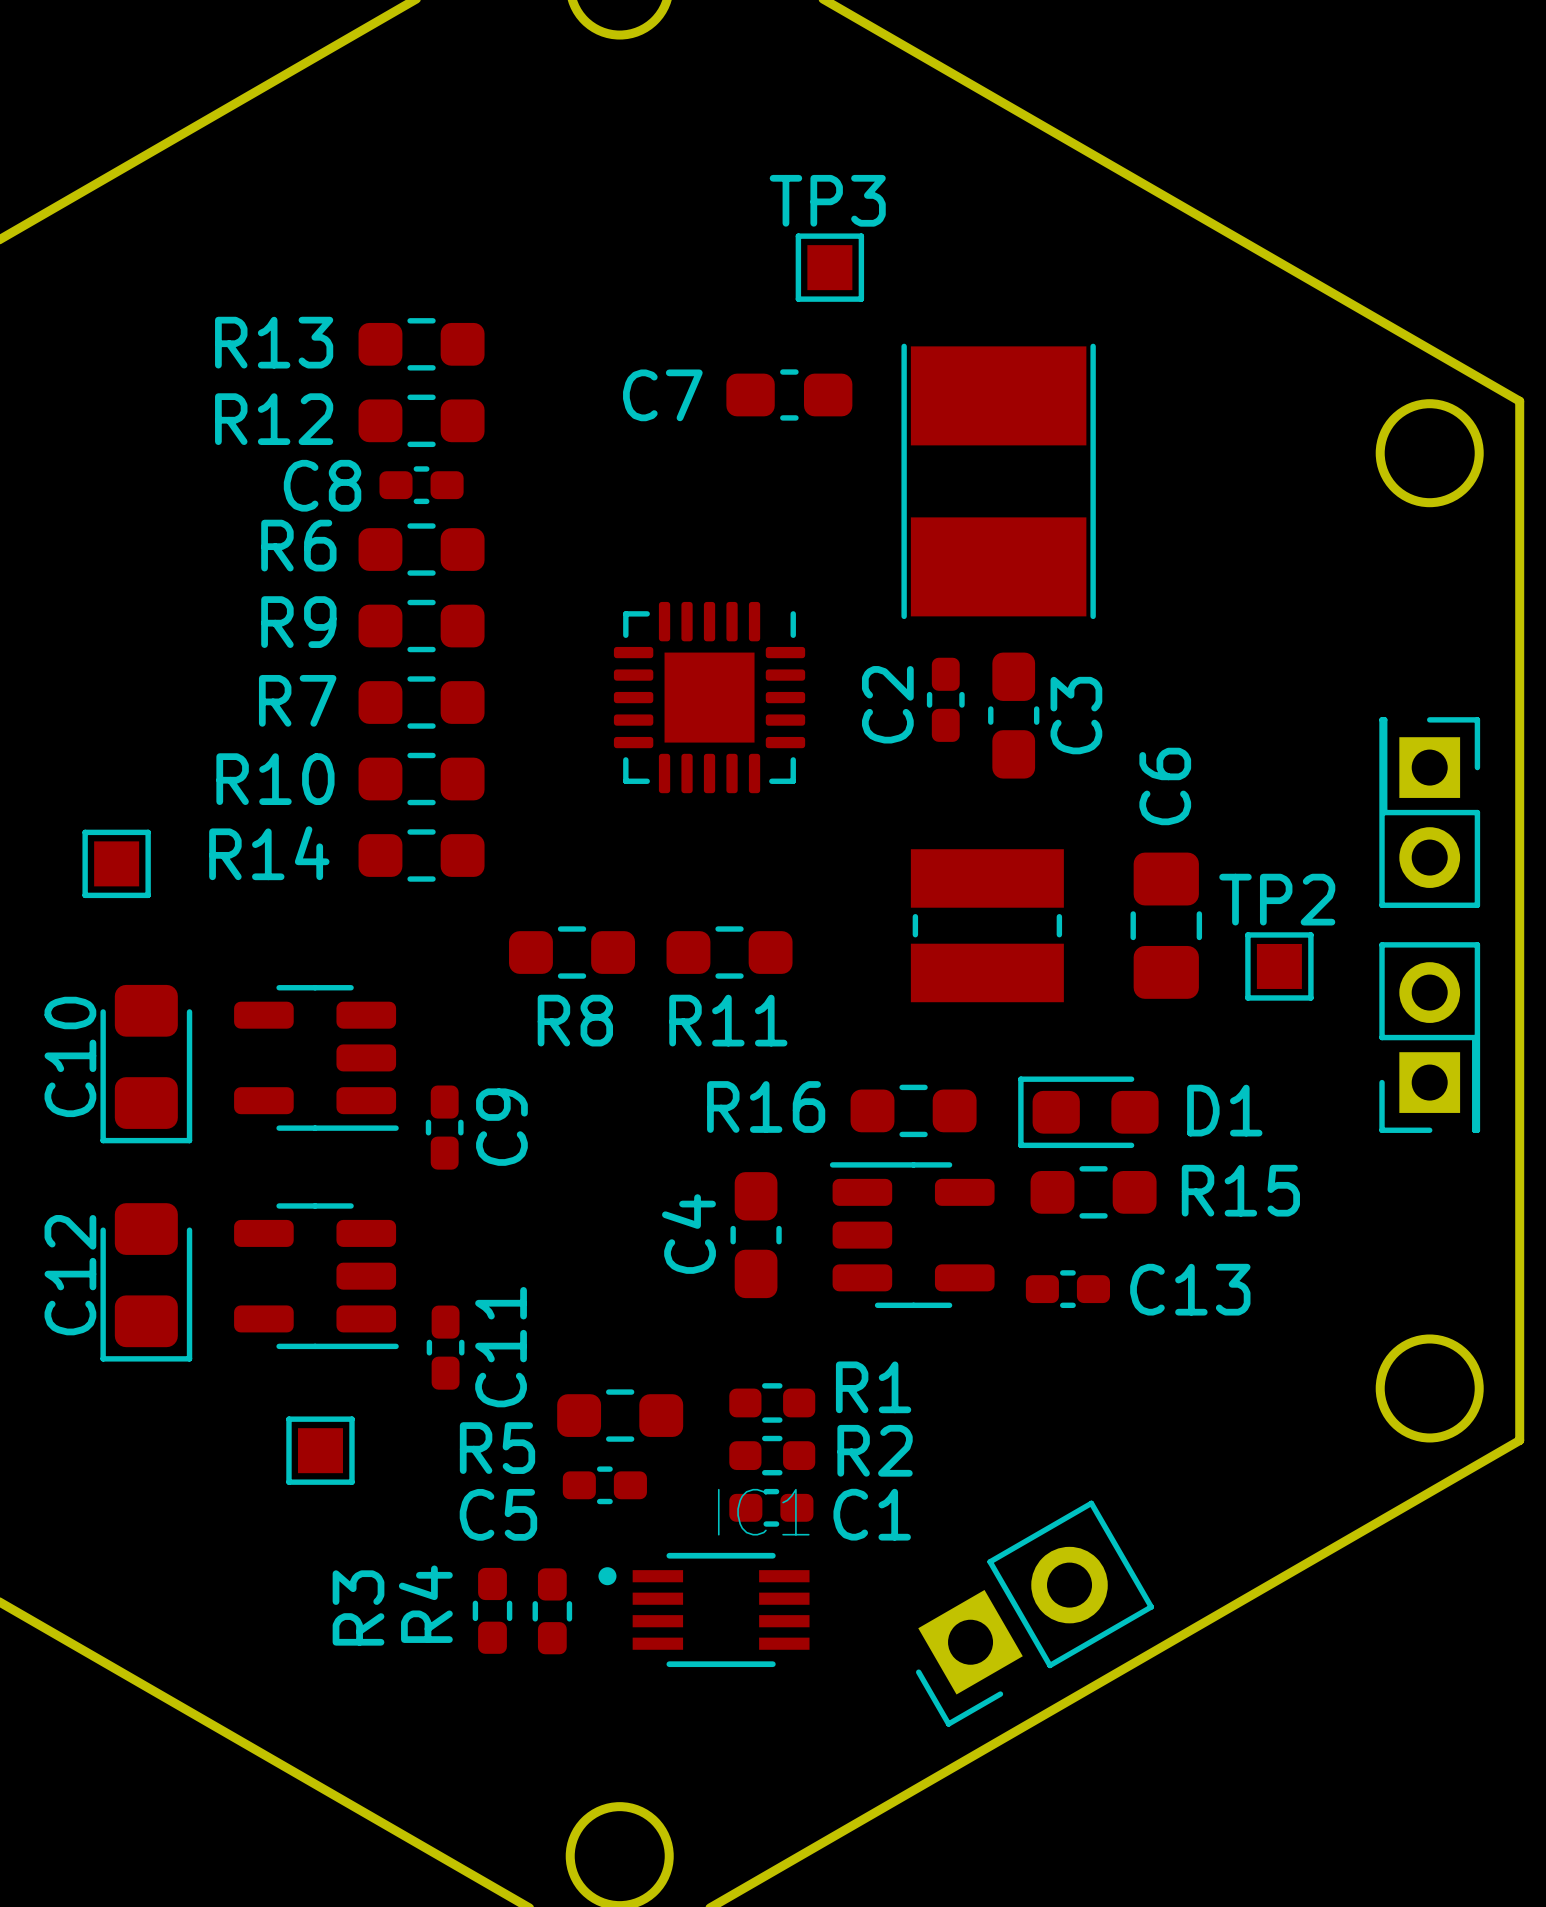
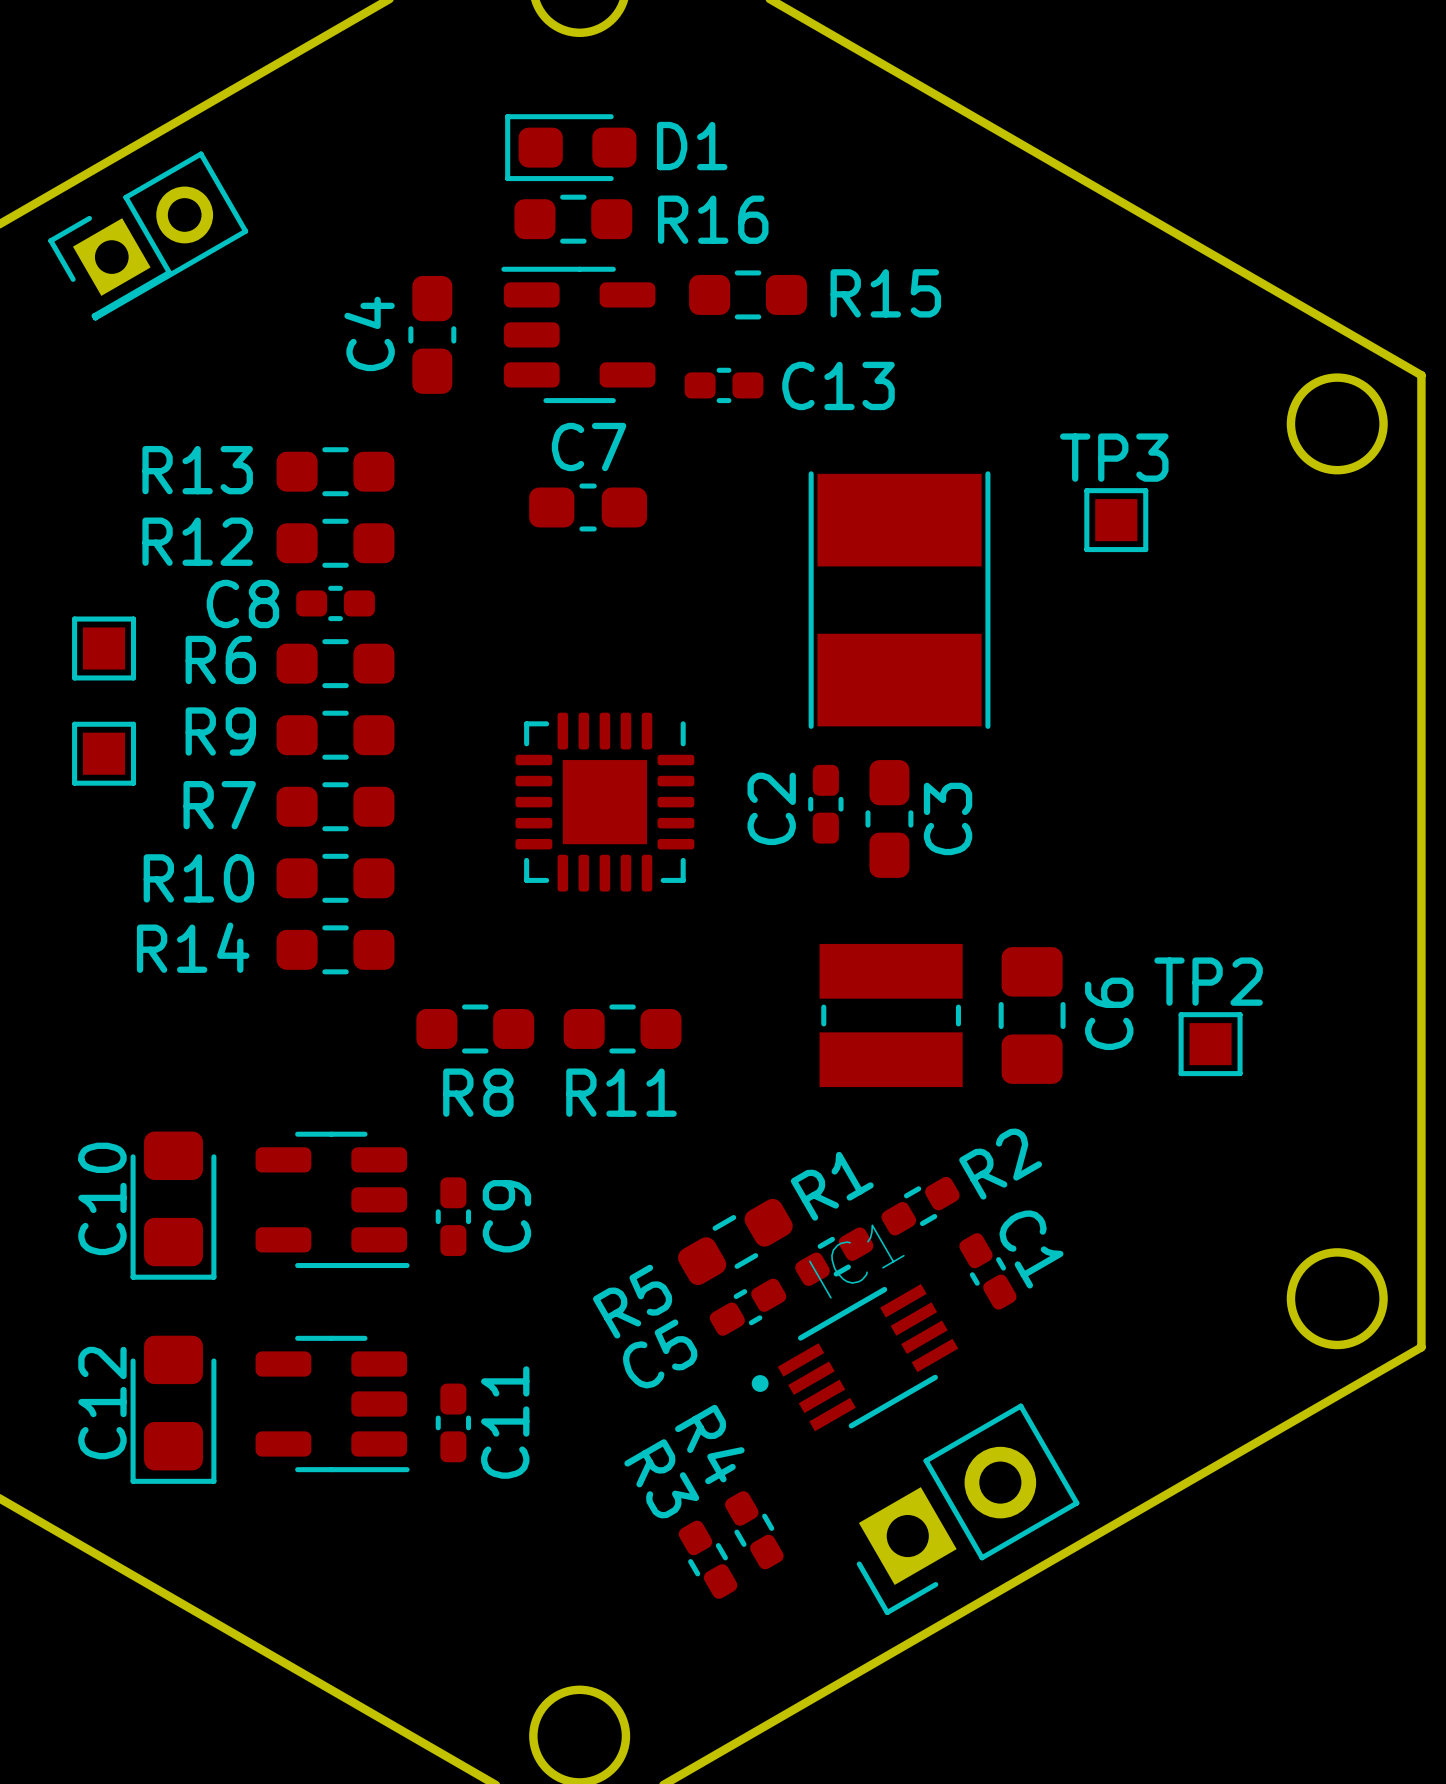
part: none -> (148, 236)
TP3 position: (829, 267) -> (1116, 520)
R13 position: (421, 344) -> (335, 471)
part: none -> (578, 334)
C7 position: (789, 394) -> (588, 507)
C7 name position: C7 (662, 395) -> C7 (589, 446)
R12 position: (421, 420) -> (335, 543)
part position: (998, 481) -> (899, 600)
C8 position: (421, 485) -> (335, 603)
R6 position: (421, 549) -> (335, 663)
R9 position: (421, 626) -> (335, 735)
part: none -> (104, 648)
part position: (709, 697) -> (604, 802)
C2 position: (945, 699) -> (825, 804)
R7 position: (421, 702) -> (335, 806)
C3 position: (1013, 715) -> (889, 818)
R10 position: (421, 779) -> (335, 878)
C6 name position: C6 (1165, 786) -> C6 (1109, 1013)
part: (1429, 812) -> none
R14 position: (421, 855) -> (335, 949)
part position: (116, 863) -> (104, 753)
part position: (987, 925) -> (891, 1015)
C6 position: (1166, 925) -> (1032, 1015)
R8 position: (572, 952) -> (475, 1028)
R11 position: (729, 952) -> (622, 1028)
TP2 position: (1279, 966) -> (1210, 1044)
part: (1429, 1037) -> none
part: (316, 1057) -> none
C10 position: (146, 1064) -> (173, 1205)
R16 name position: R16 (766, 1106) -> R16 (713, 219)
R16 position: (913, 1110) -> (573, 219)
D1 name position: D1 (1224, 1110) -> D1 (692, 146)
D1 position: (1088, 1112) -> (570, 147)
C9 position: (444, 1127) -> (453, 1216)
R15 position: (1093, 1192) -> (748, 294)
C4 position: (756, 1235) -> (432, 334)
part: (912, 1235) -> none
part position: (316, 1276) -> (332, 1199)
C12 position: (146, 1282) -> (173, 1409)
C13 position: (1067, 1289) -> (724, 385)
C11 position: (445, 1347) -> (453, 1422)
R1 rotation: 0° (772, 1402) -> 30° counterclockwise (834, 1256)
R1 position: (772, 1402) -> (834, 1256)
R5 rotation: 0° (620, 1415) -> 30° counterclockwise (735, 1241)
R5 position: (620, 1415) -> (735, 1241)
part: (320, 1450) -> none
R2 rotation: 0° (772, 1455) -> 30° counterclockwise (920, 1206)
R2 position: (772, 1455) -> (920, 1206)
C5 rotation: 0° (604, 1485) -> 30° counterclockwise (748, 1307)
C5 position: (604, 1485) -> (748, 1307)
part: none -> (332, 1403)
C1 rotation: 0° (771, 1507) -> 60° clockwise (987, 1271)
C1 position: (771, 1507) -> (987, 1271)
R4 name position: R4 (425, 1604) -> R4 (709, 1444)
R3 name position: R3 (358, 1607) -> R3 (661, 1478)
IC1 rotation: 0° (703, 1609) -> 30° counterclockwise (854, 1357)
IC1 position: (703, 1609) -> (854, 1357)
R3 rotation: 0° (492, 1610) -> 30° counterclockwise (708, 1559)
R3 position: (492, 1610) -> (708, 1559)
R4 rotation: 0° (552, 1611) -> 30° counterclockwise (754, 1530)
R4 position: (552, 1611) -> (754, 1530)

